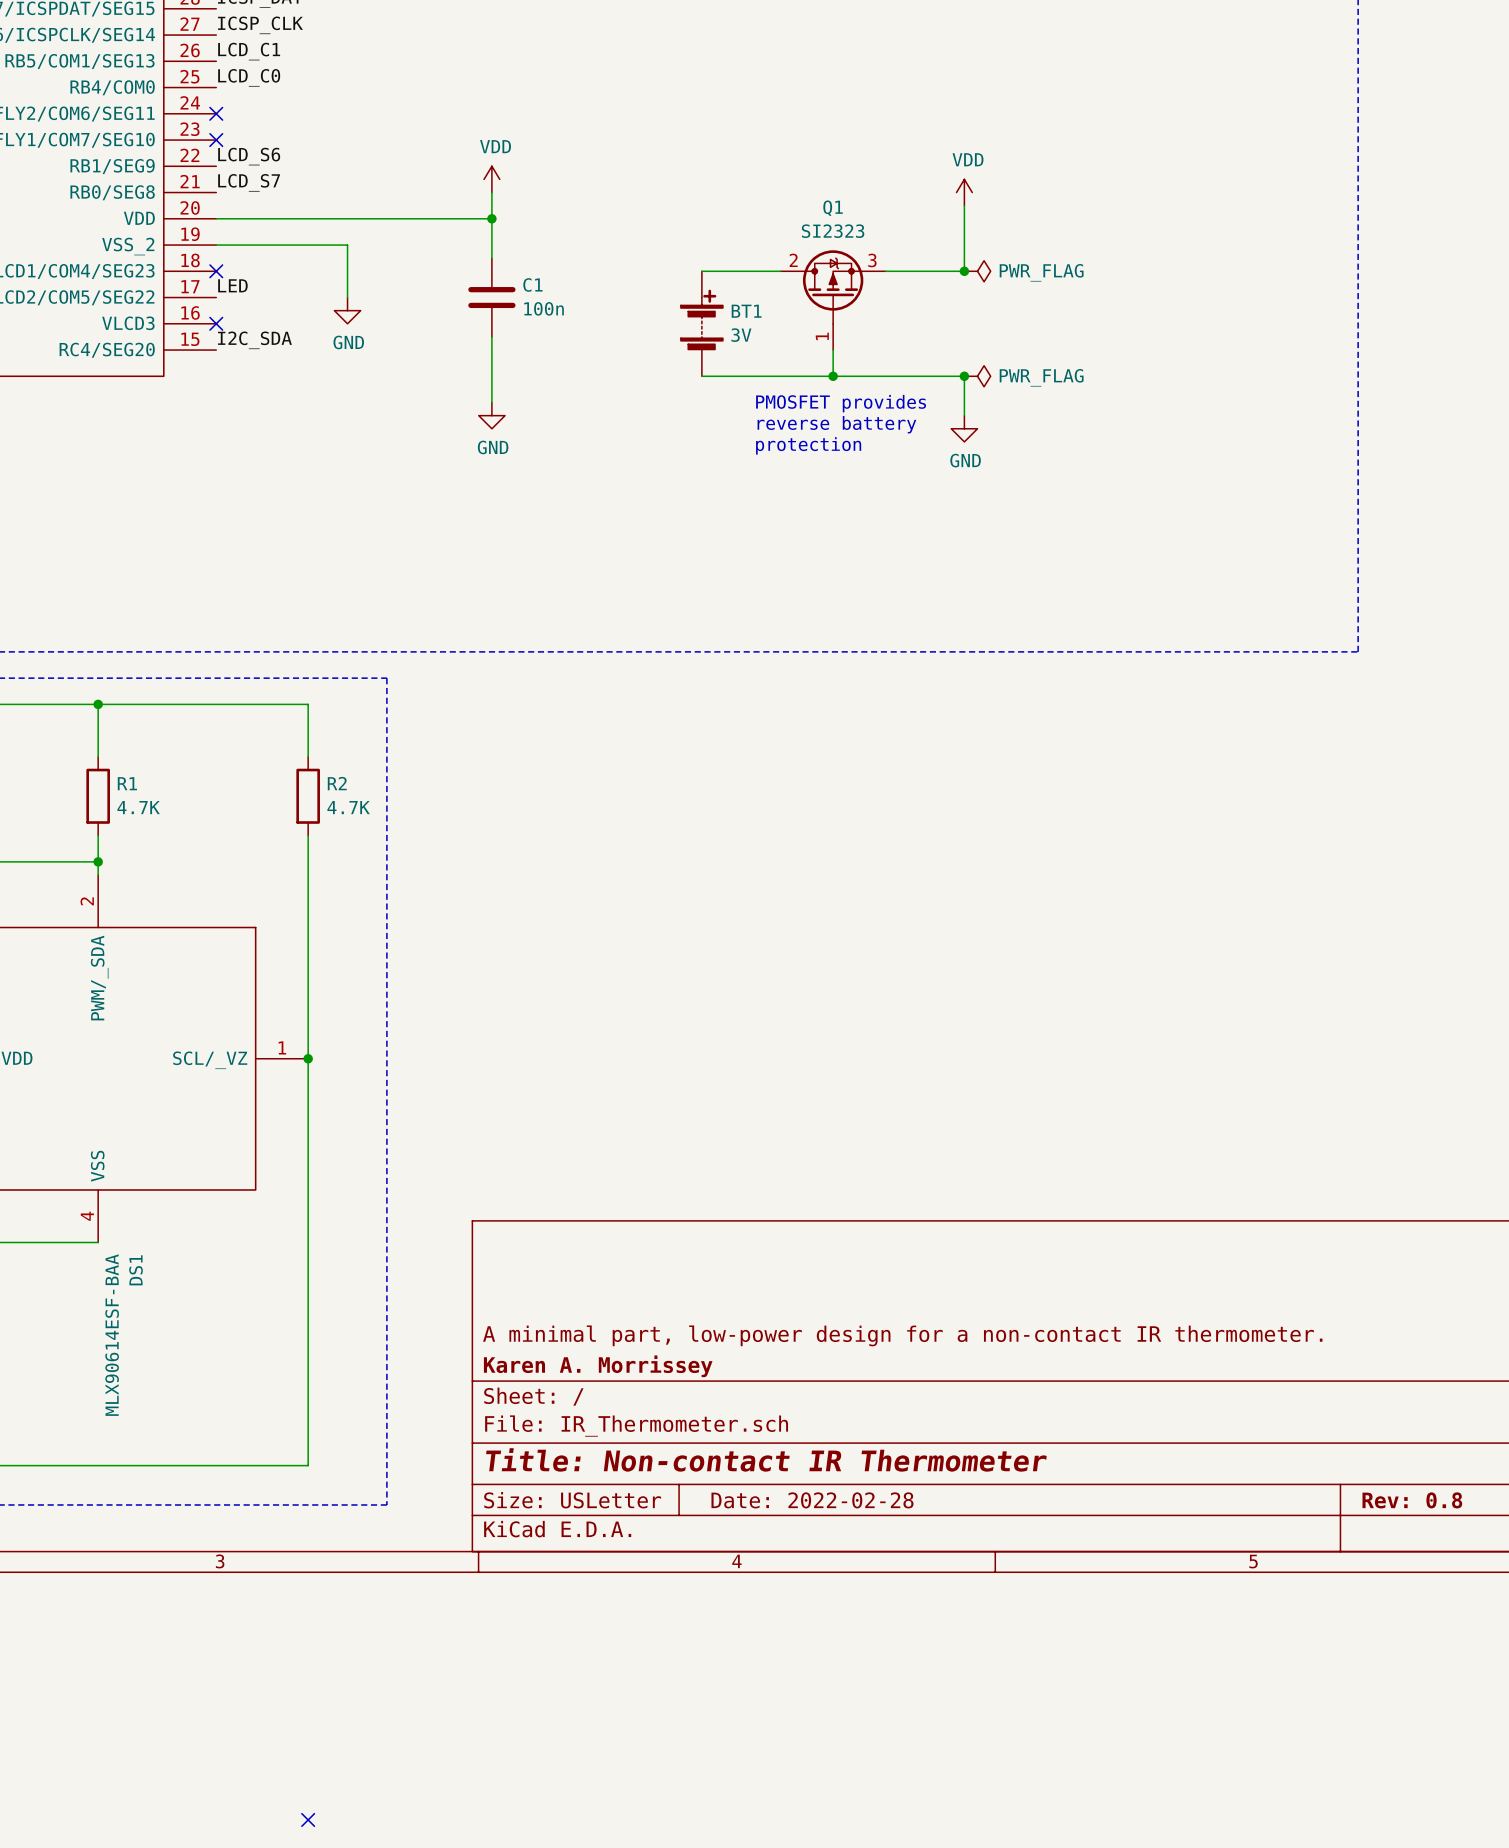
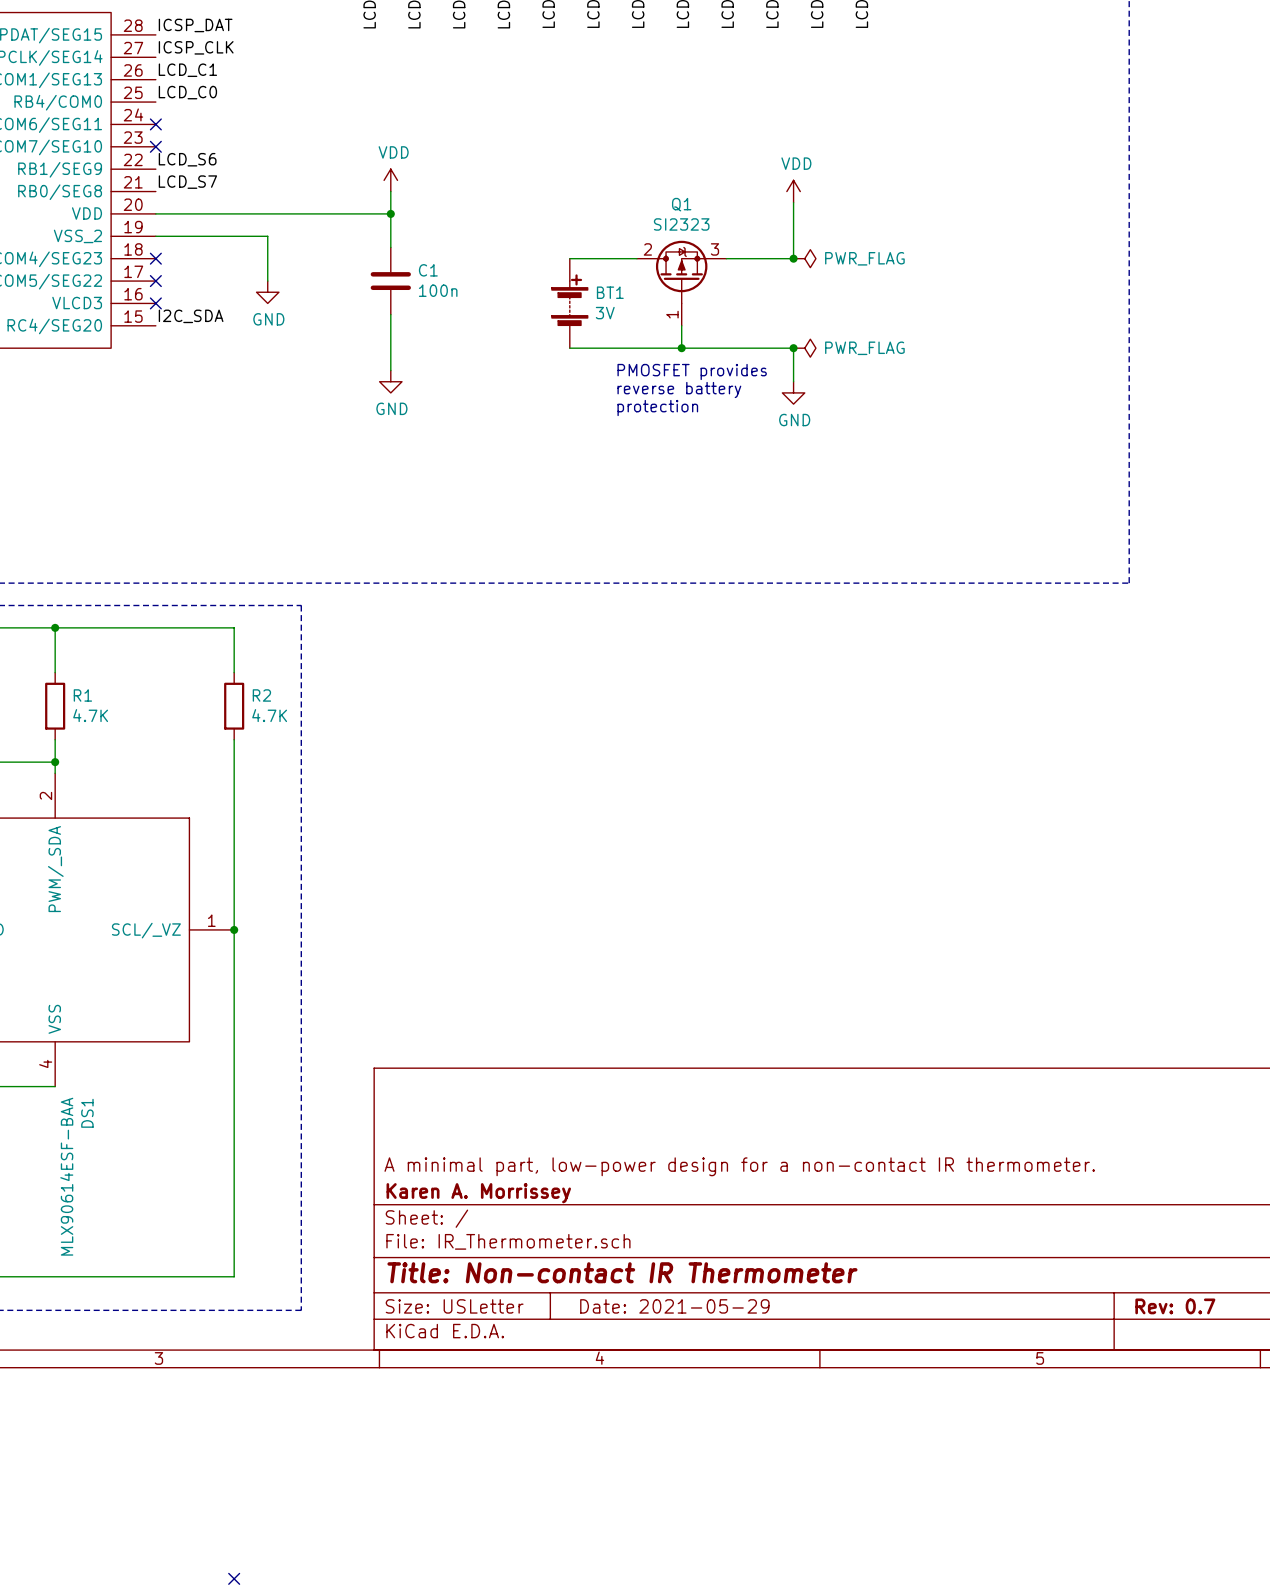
label: LED (232, 285) -> none
no-connect mark: none -> (155, 281)
title block: Date: 2022-02-28 (812, 1500) -> Date: 2021-05-29 (674, 1306)
title block: Rev: 0.8 (1412, 1500) -> Rev: 0.7 (1175, 1306)

